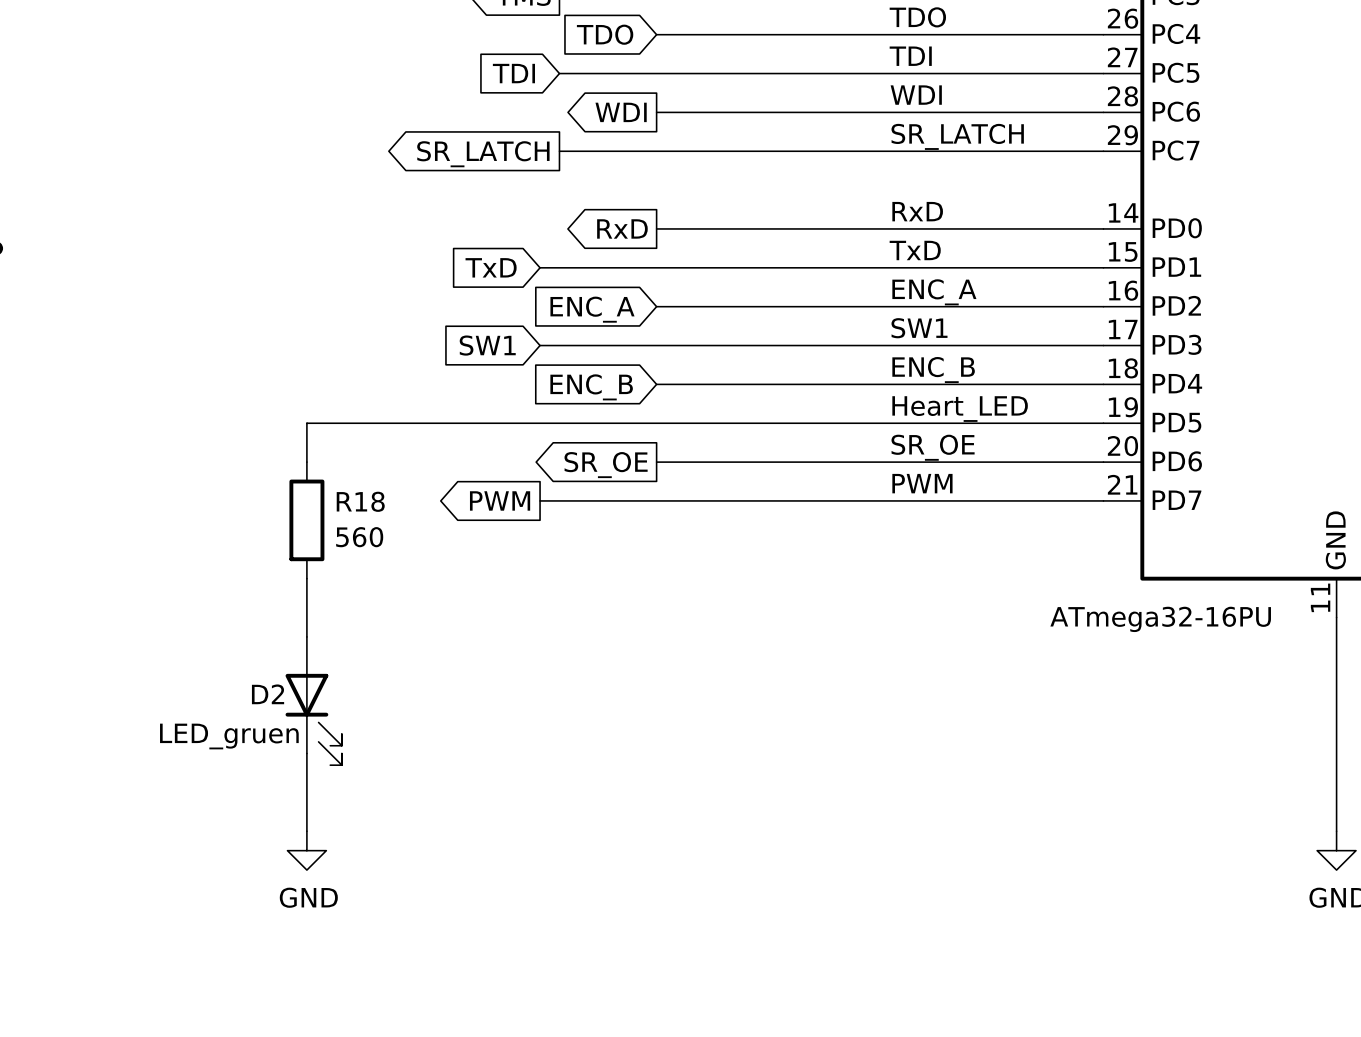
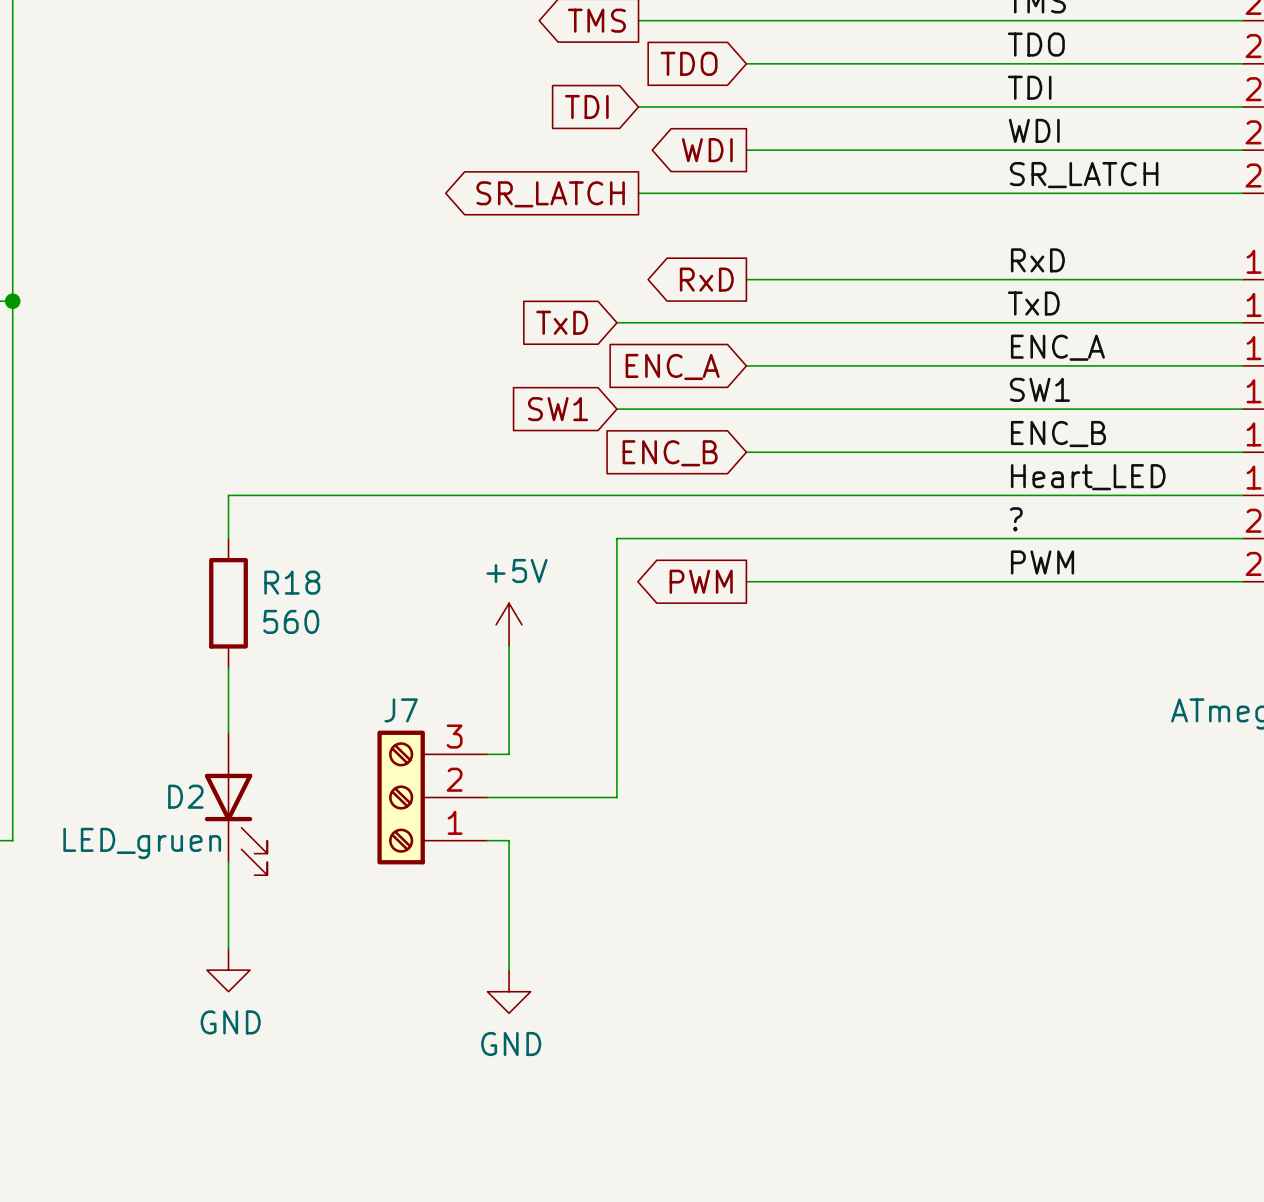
wire: (306, 423) (306, 462) -> (357, 495) (228, 495) (228, 538)
label: SR_OE (933, 447) -> ? (1016, 519)
wire: none -> (746, 538) (616, 538) (616, 797) (487, 797)
global label: SR_OE (606, 465) -> none
global label position: PWM (500, 500) -> PWM (701, 581)
wire: (540, 500) (656, 500) -> none
R18 position: (306, 520) -> (228, 603)
power symbol: none -> +5V (509, 624)
wire: none -> (509, 646) (509, 754) (487, 754)
wire: (306, 578) (306, 636) -> (228, 668) (228, 732)
J7: none -> (432, 797)
D2 position: (313, 701) -> (236, 803)
wire: none -> (487, 840) (509, 840) (509, 970)
wire: (306, 753) (306, 831) -> (228, 862) (228, 948)
power symbol: none -> GND (228, 970)
power symbol: GND (306, 850) -> none
power symbol: none -> GND (509, 991)

